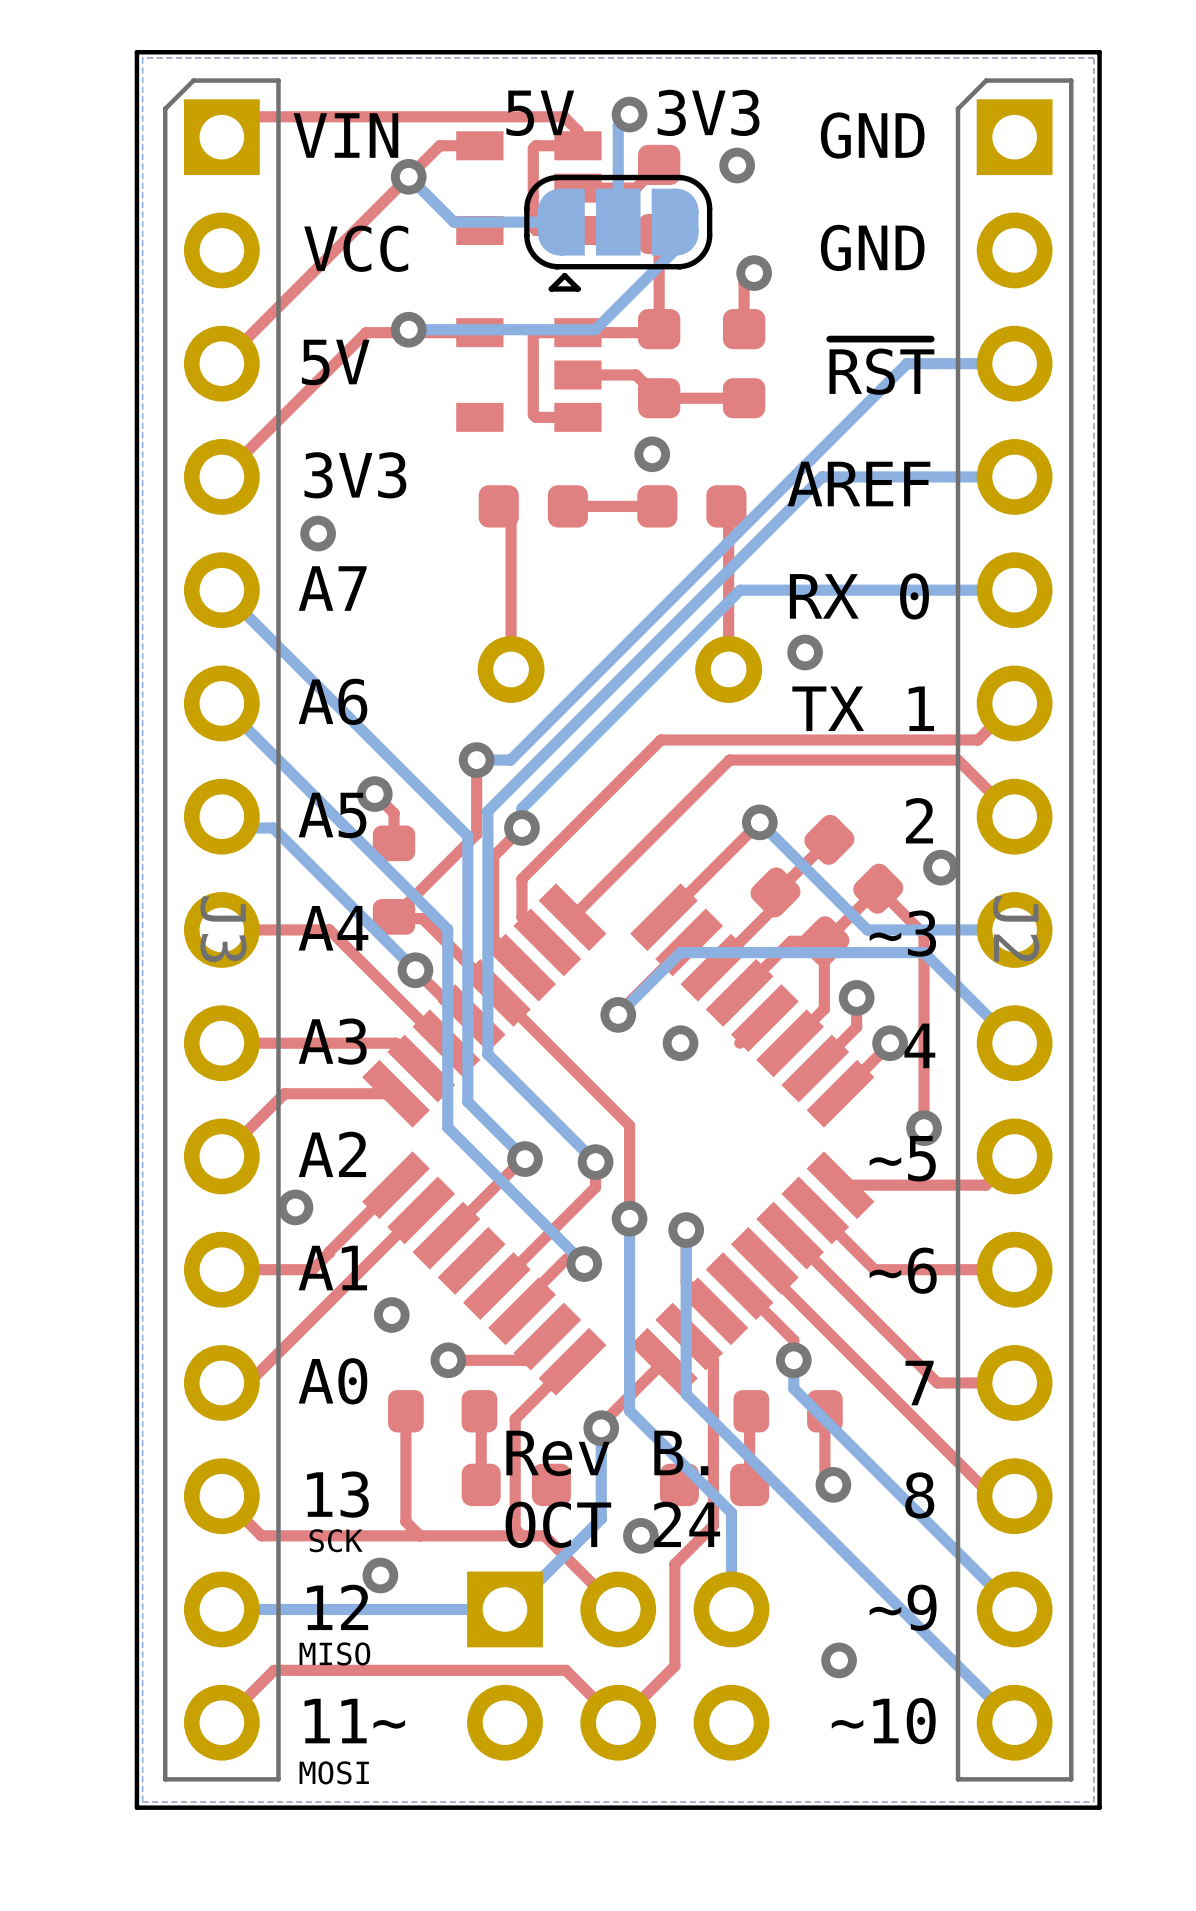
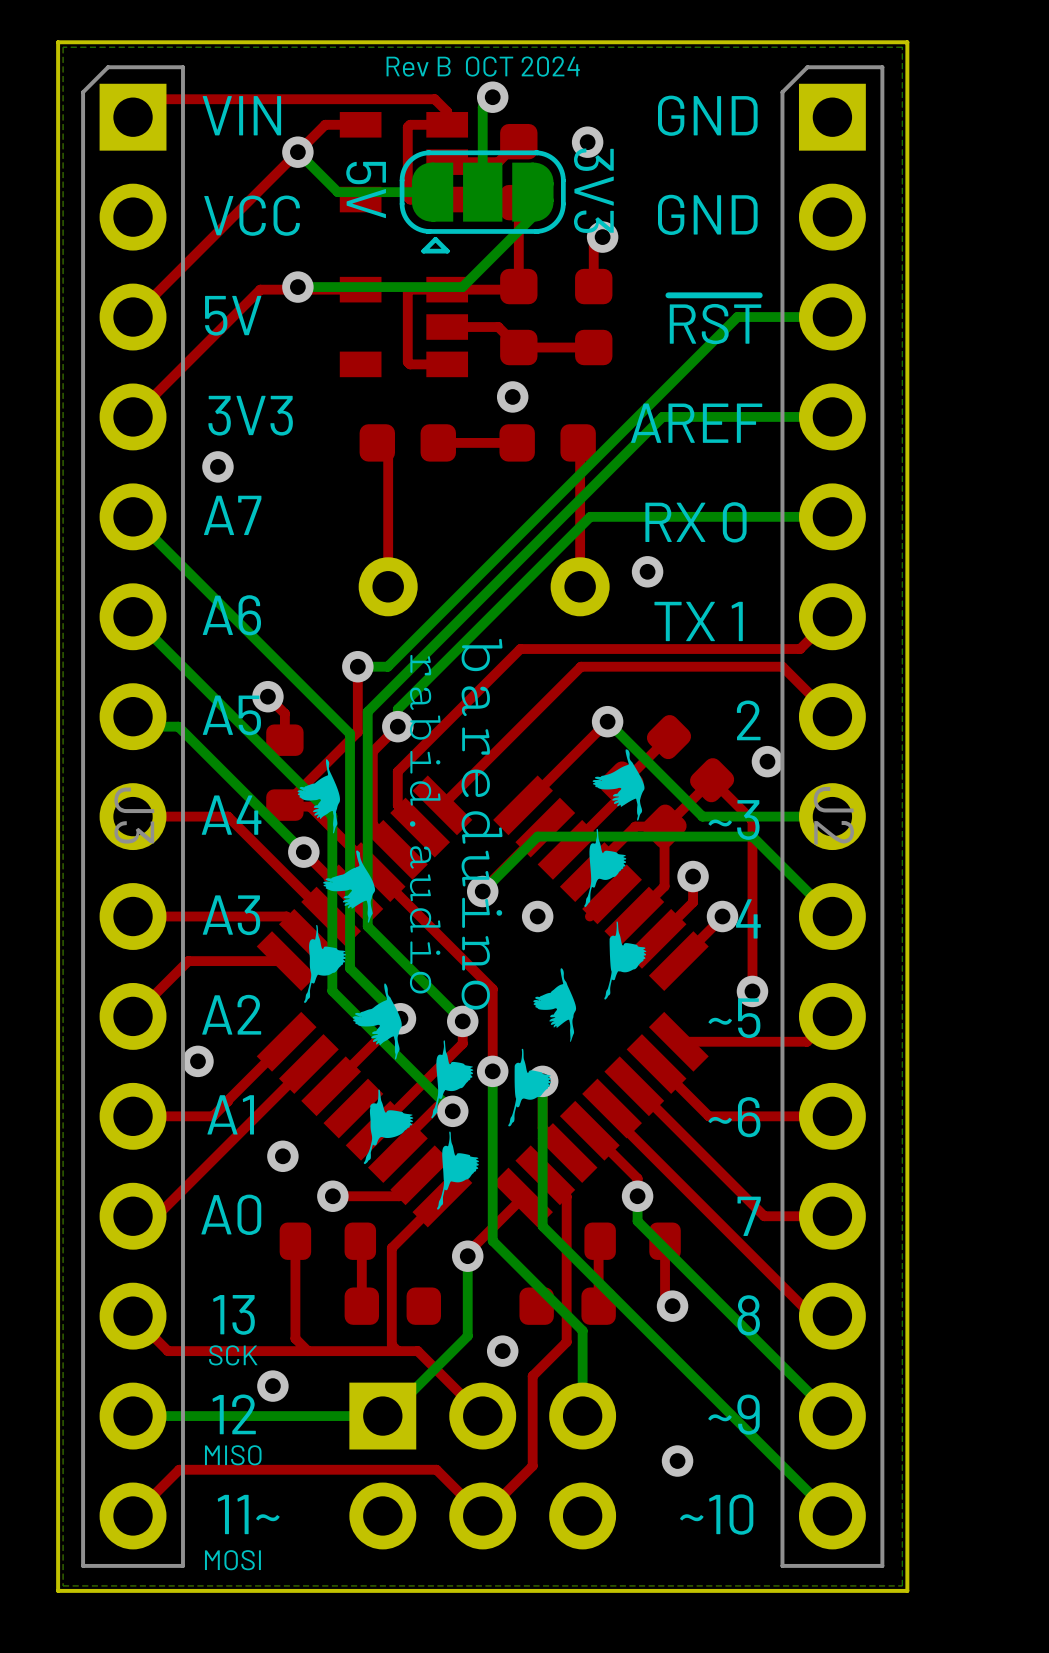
text: none -> Rev B OCT 2024 (483, 66)
text rotation: 0° (708, 112) -> 90° clockwise (593, 190)
text rotation: 0° (540, 113) -> 90° clockwise (366, 190)
text position: 5V (540, 113) -> 5V (366, 190)
drawing: none -> [297, 638, 647, 1210]
text: Rev B. (607, 1453) -> none
text: OCT 24 (612, 1524) -> none

